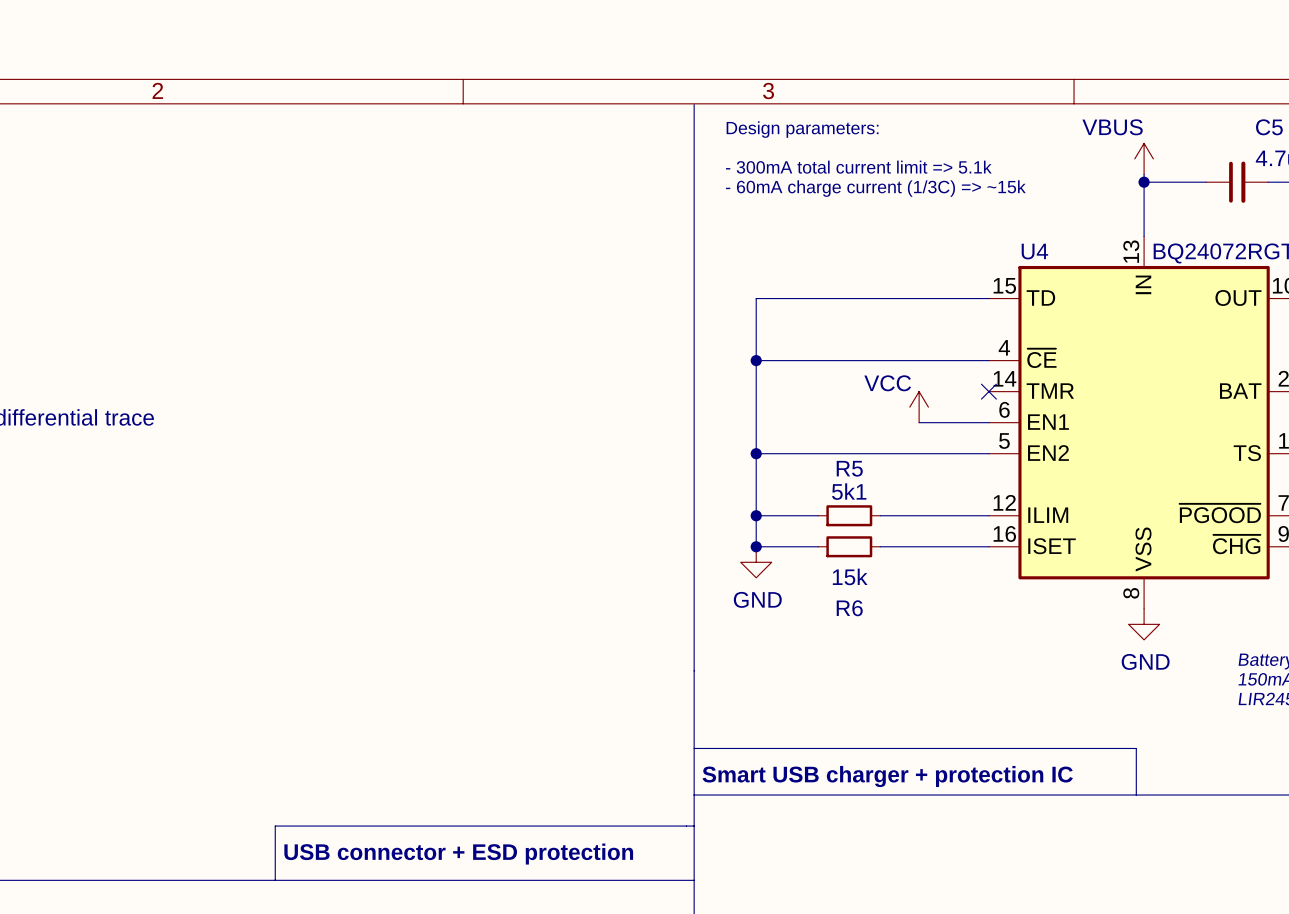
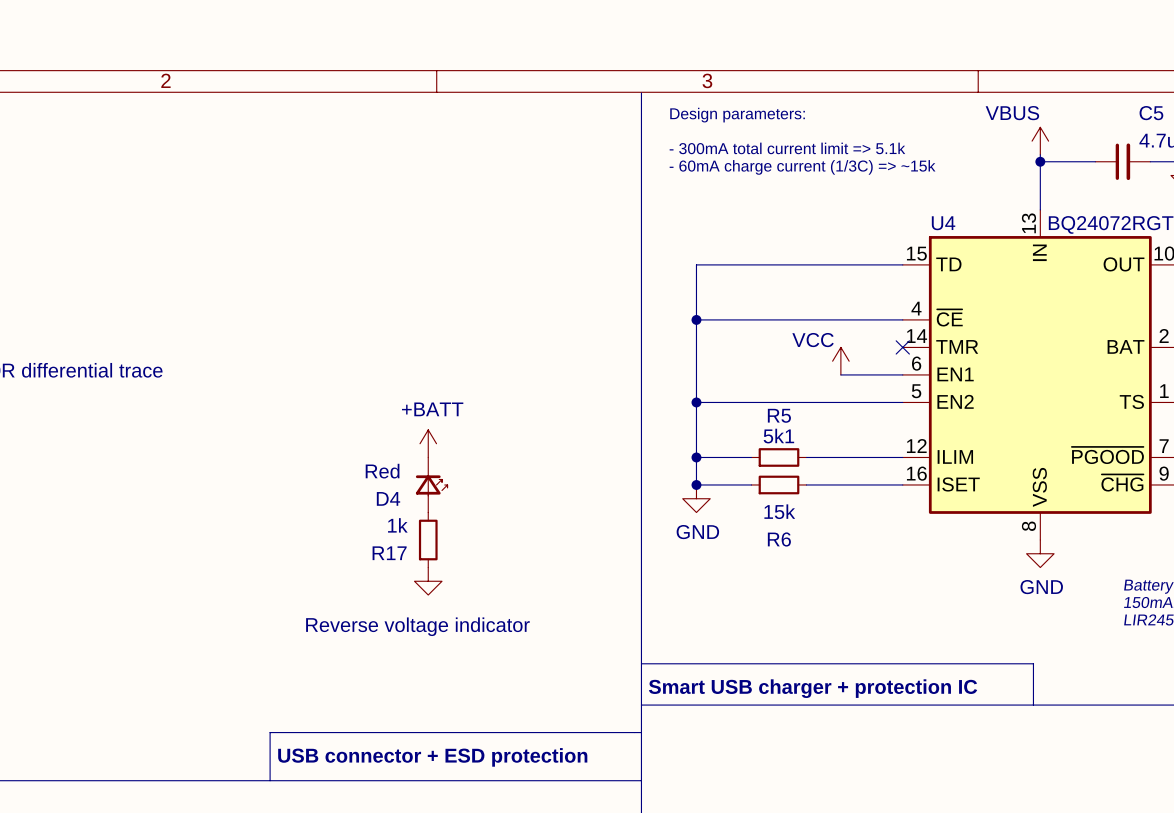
power symbol: none -> +BATT (428, 443)
D4: none -> Red (431, 484)
R17: none -> 1k (428, 540)
power symbol: none -> (428, 581)
text: none -> Reverse voltage indicator (417, 626)

